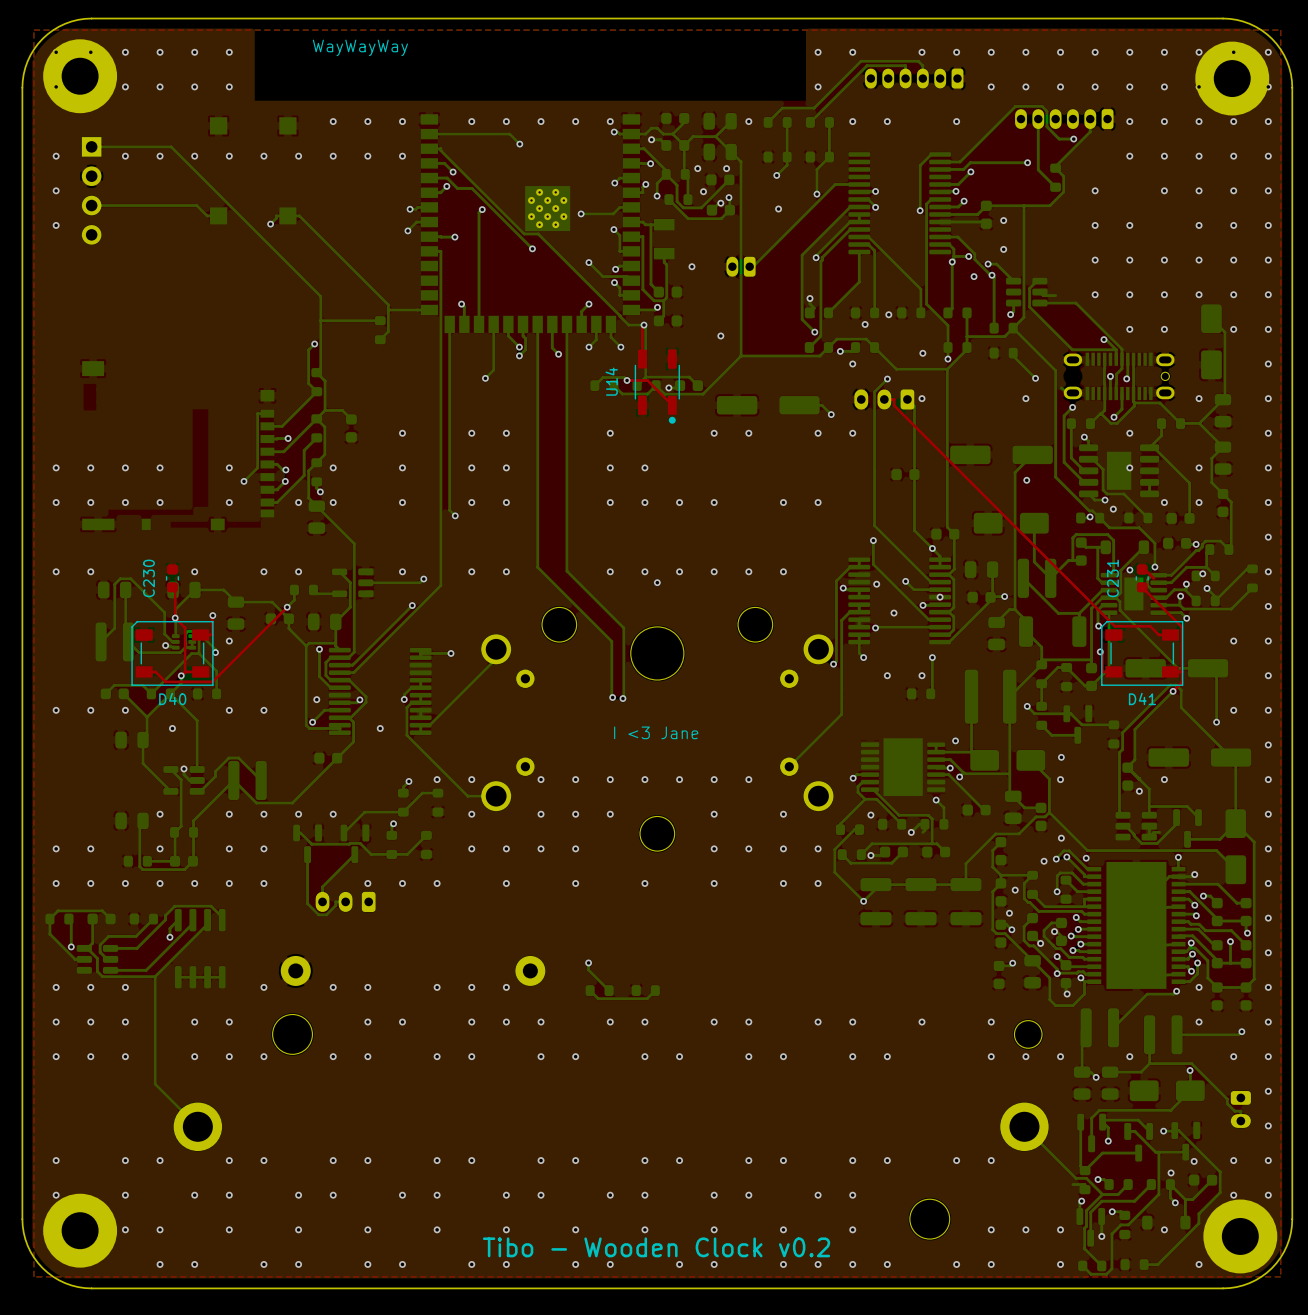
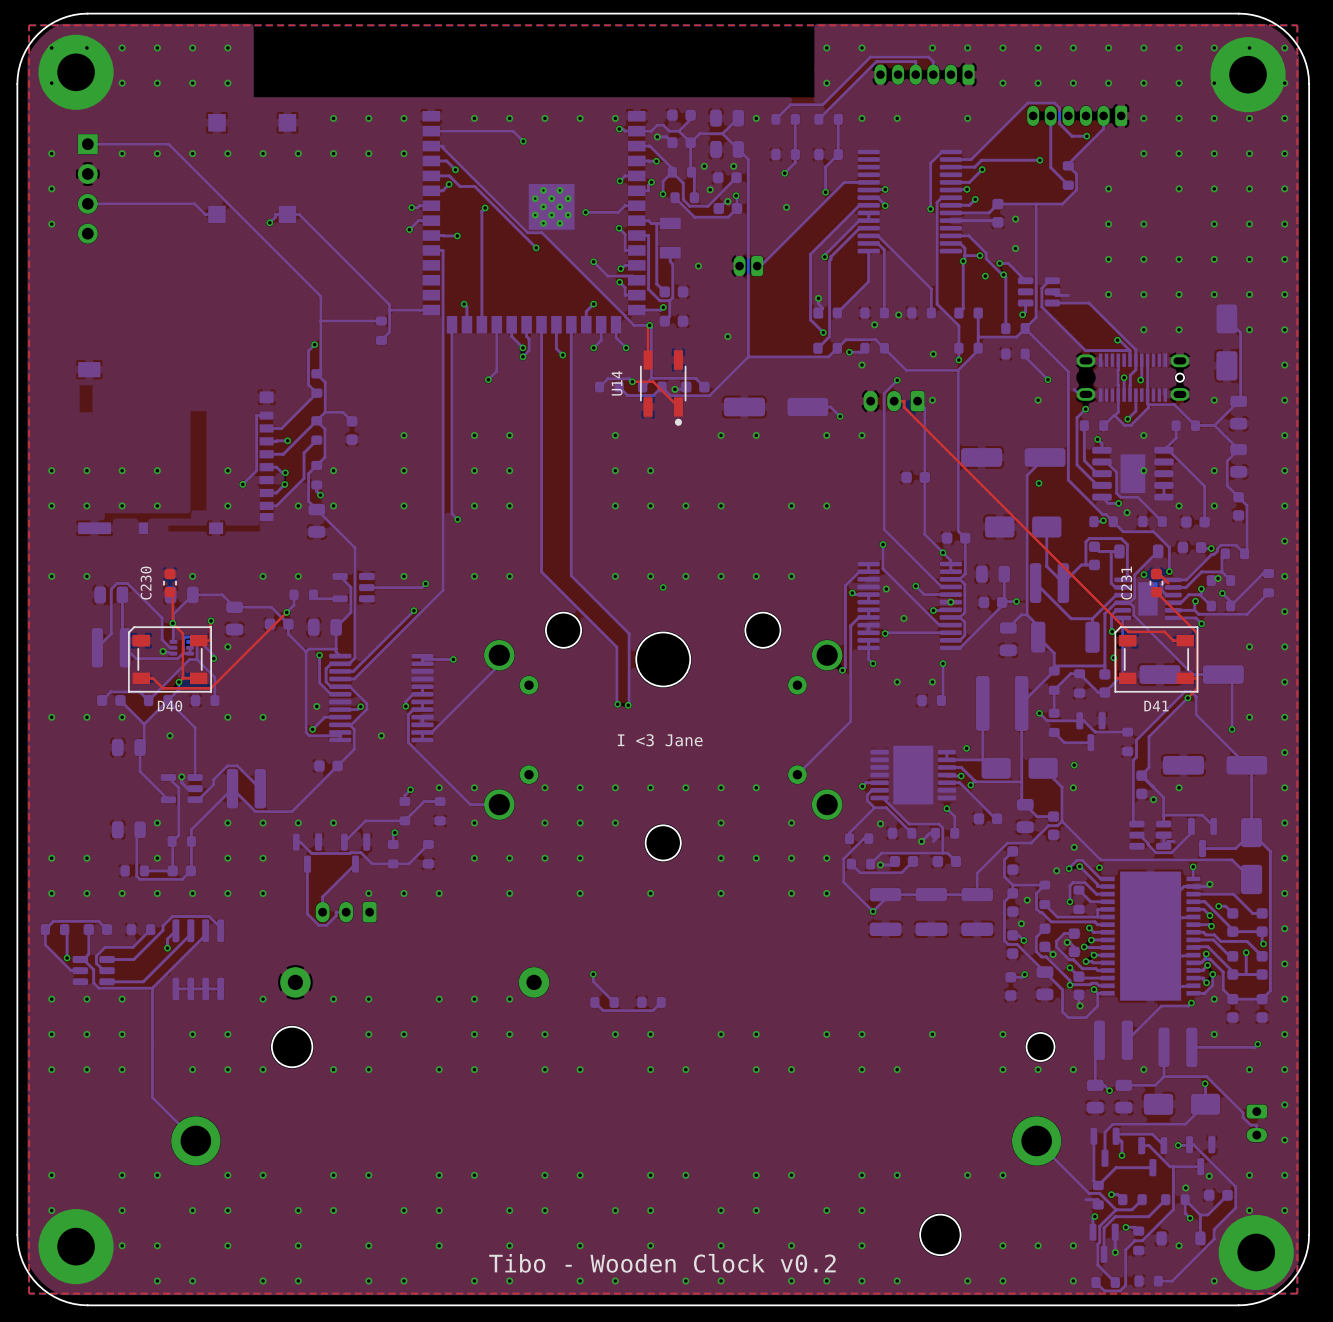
text: WayWayWay (360, 47) -> none

